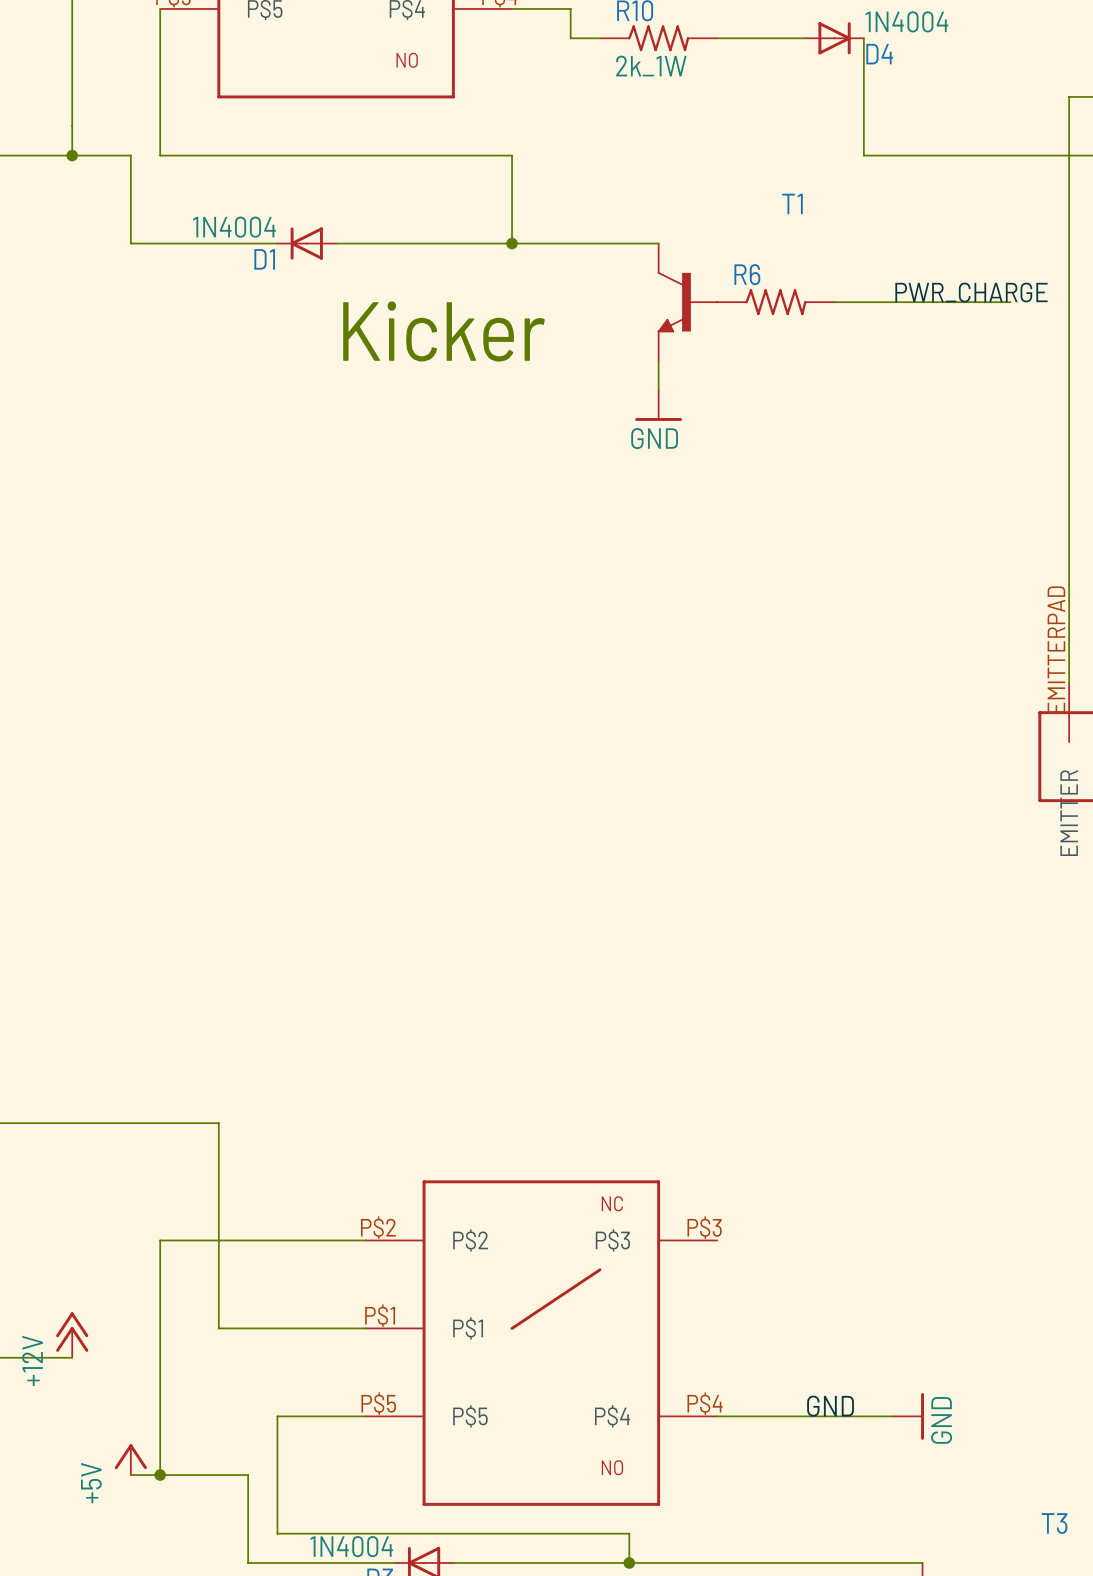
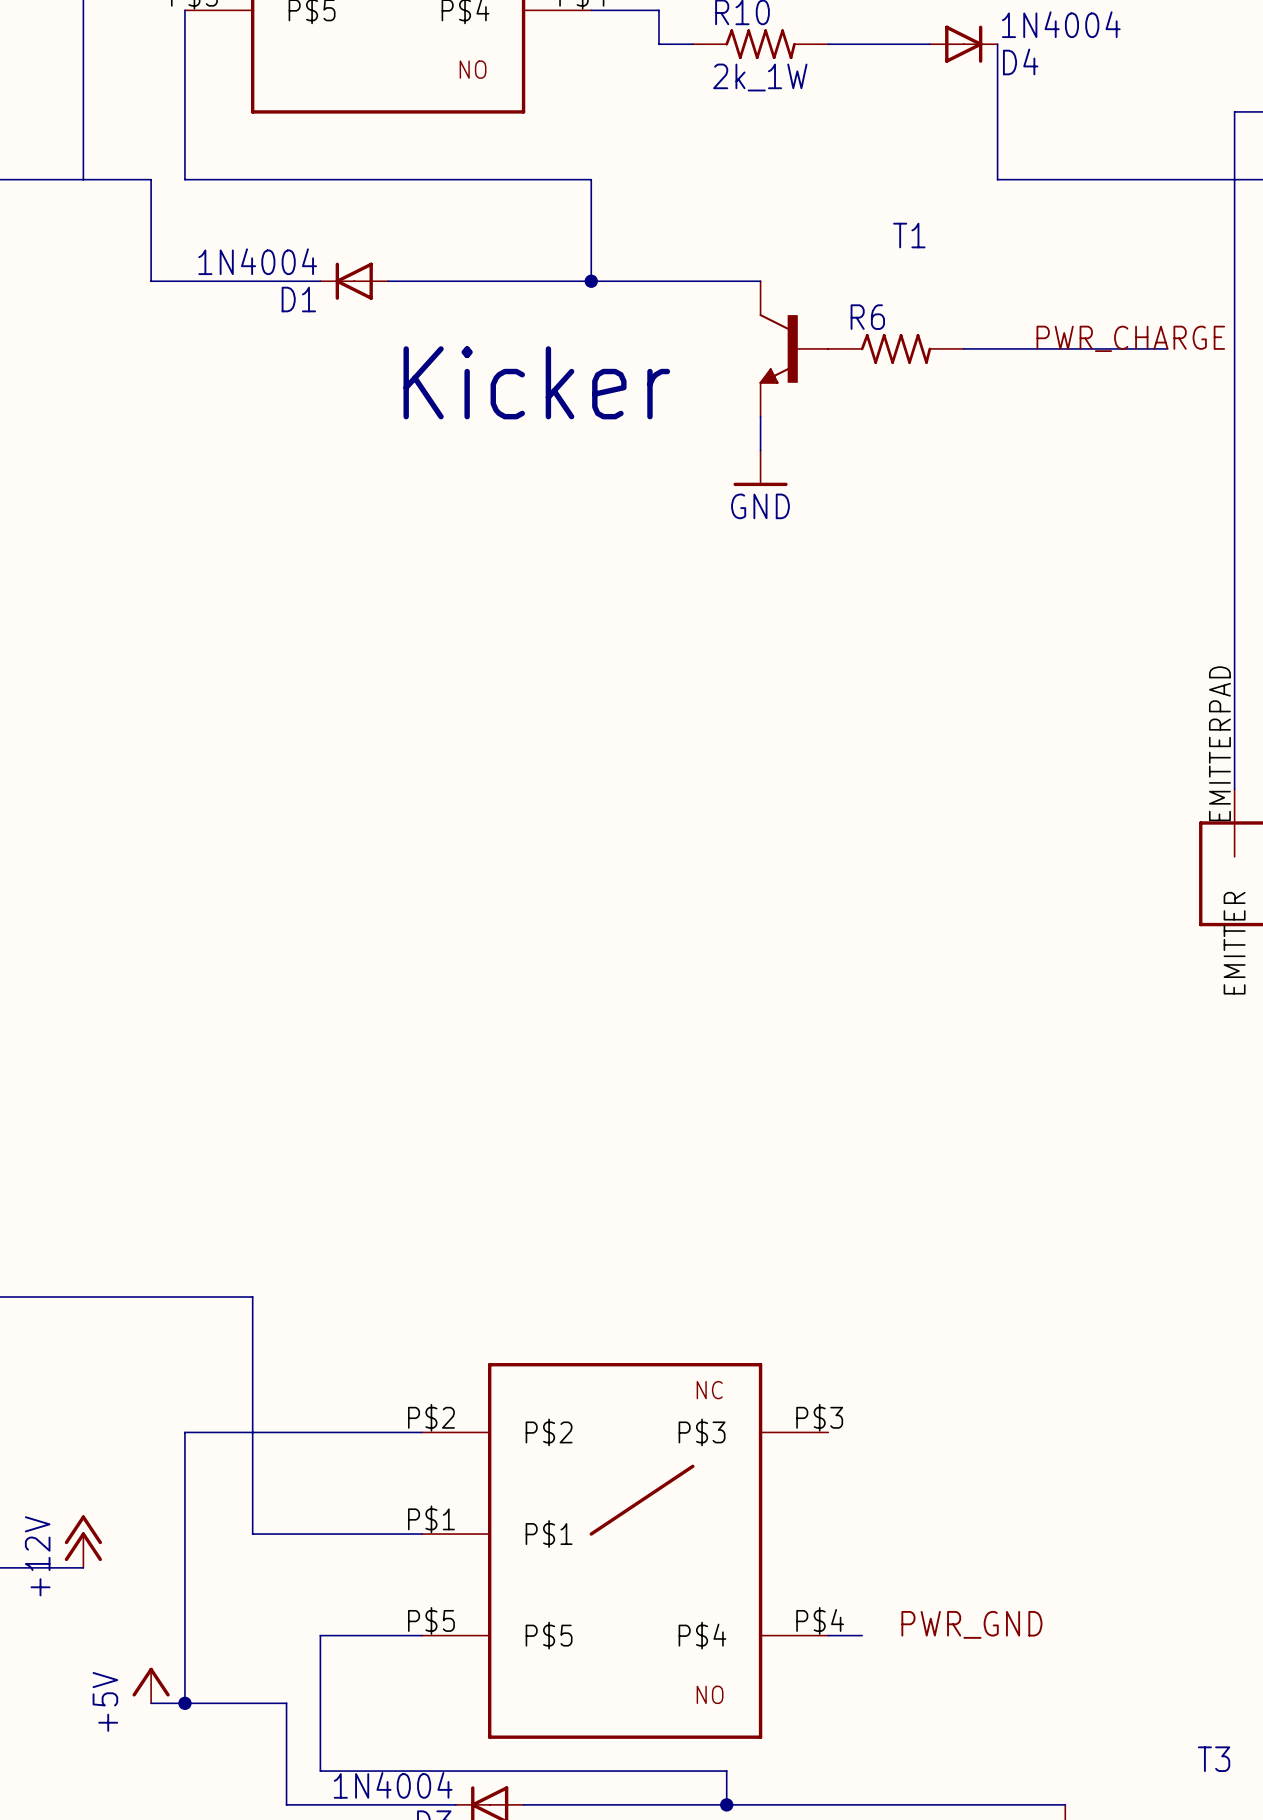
junction: (72, 155) -> none
label: GND (830, 1406) -> none
label: none -> PWR_GND (971, 1624)
wire: (746, 1416) (893, 1416) -> none
power symbol: GND (908, 1416) -> none

